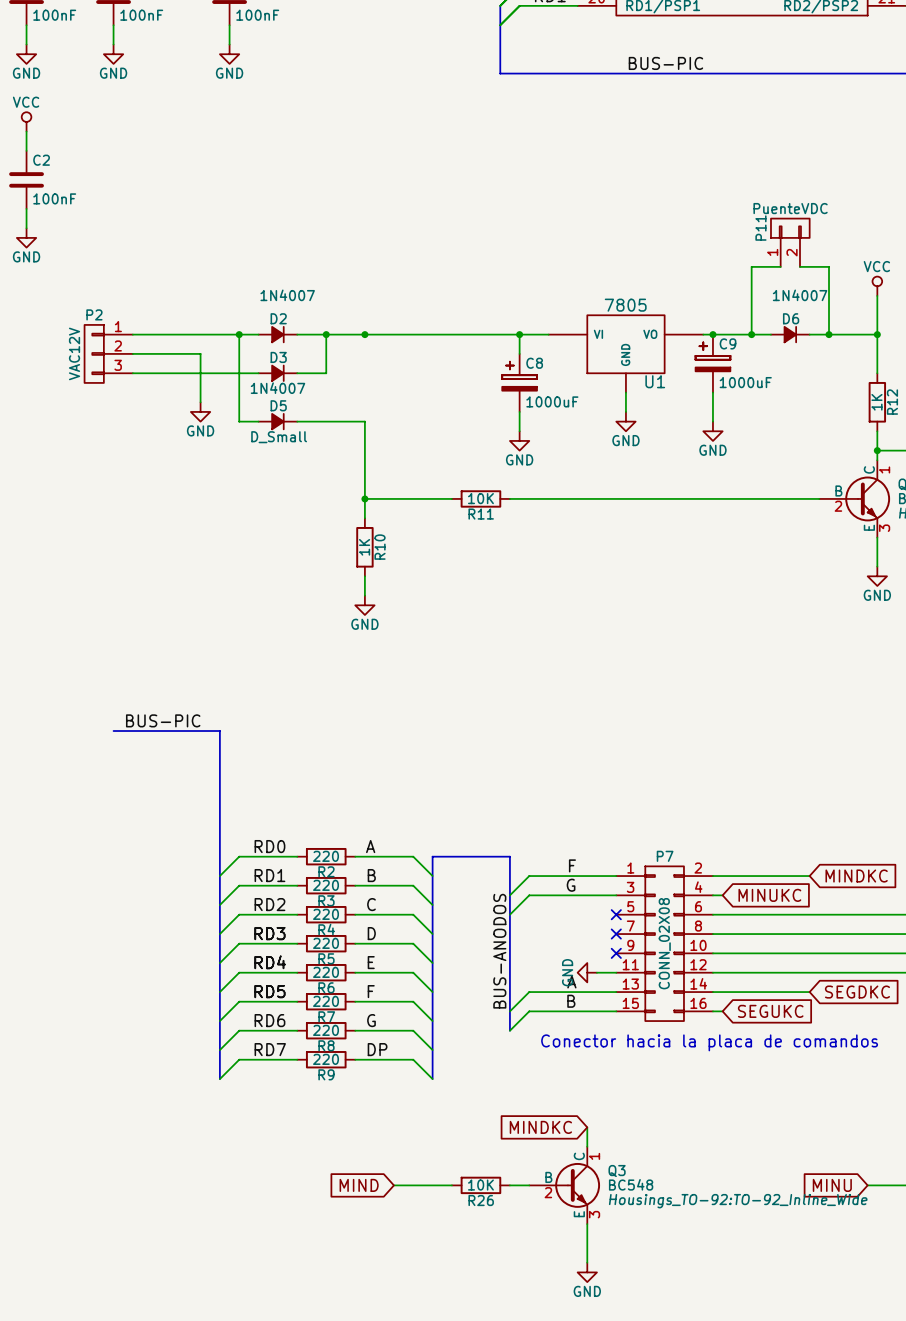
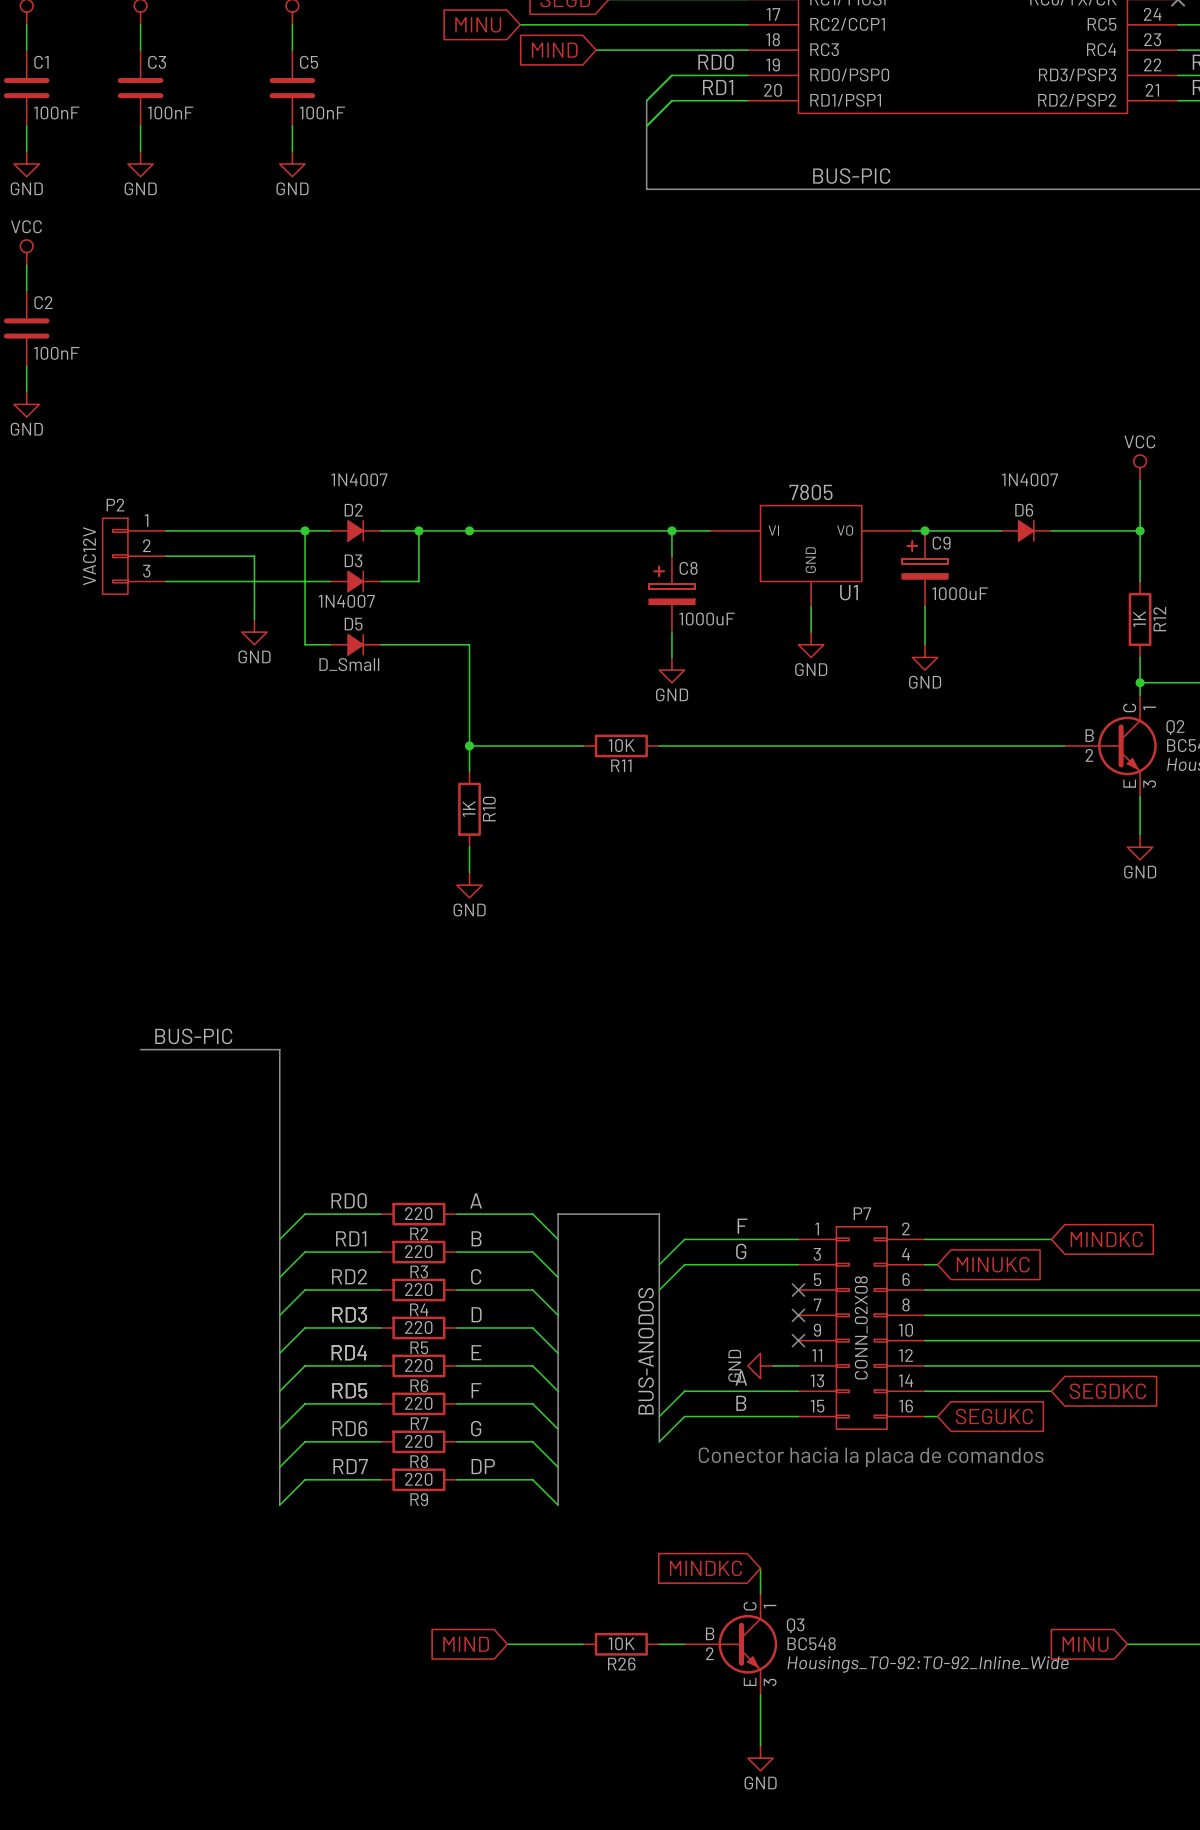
P11: PuenteVDC (790, 242) -> none
wire: (780, 266) (751, 266) (751, 334) -> none
wire: (799, 266) (829, 266) (829, 334) -> none
junction: (751, 334) -> none
junction: (829, 334) -> none

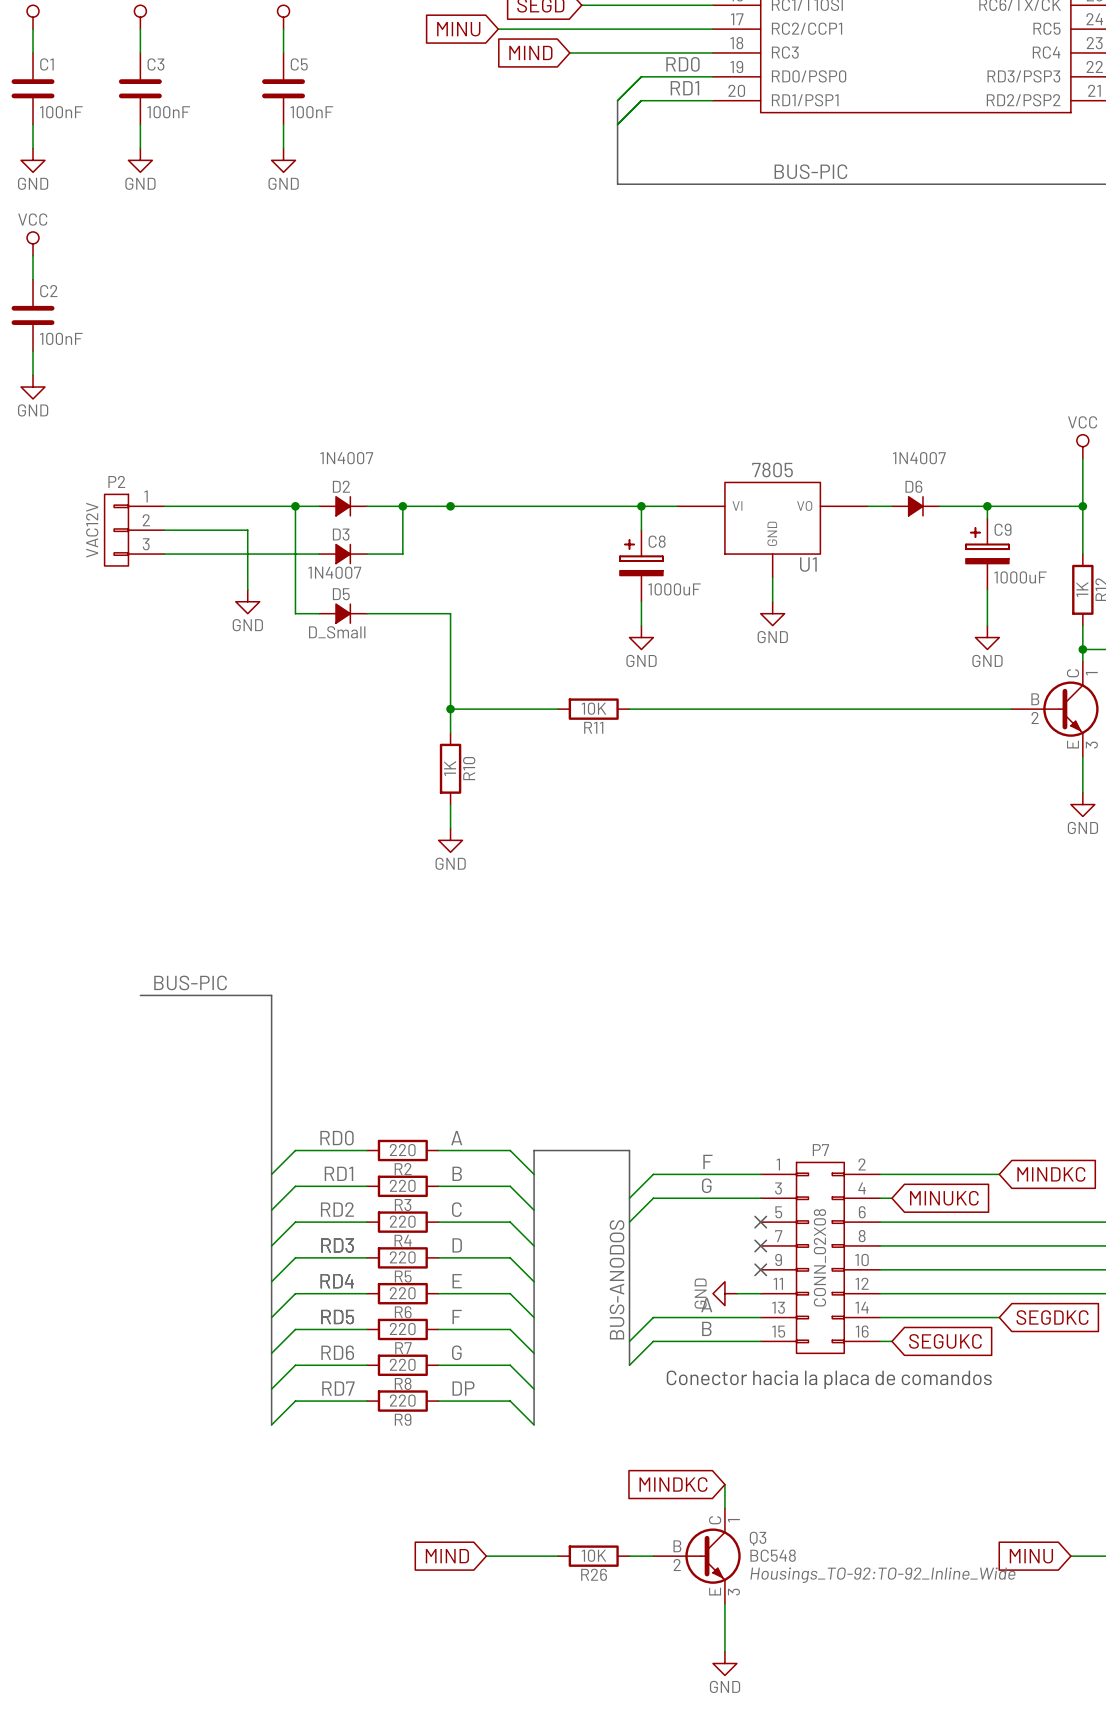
junction: (925, 530) -> none
D6 position: (1026, 530) -> (915, 506)
wire: none -> (987, 506) (987, 518)
junction: none -> (987, 506)
C9 position: (925, 568) -> (987, 554)
wire: (925, 606) (925, 644) -> (987, 589) (987, 625)
power symbol position: GND (925, 657) -> GND (987, 637)

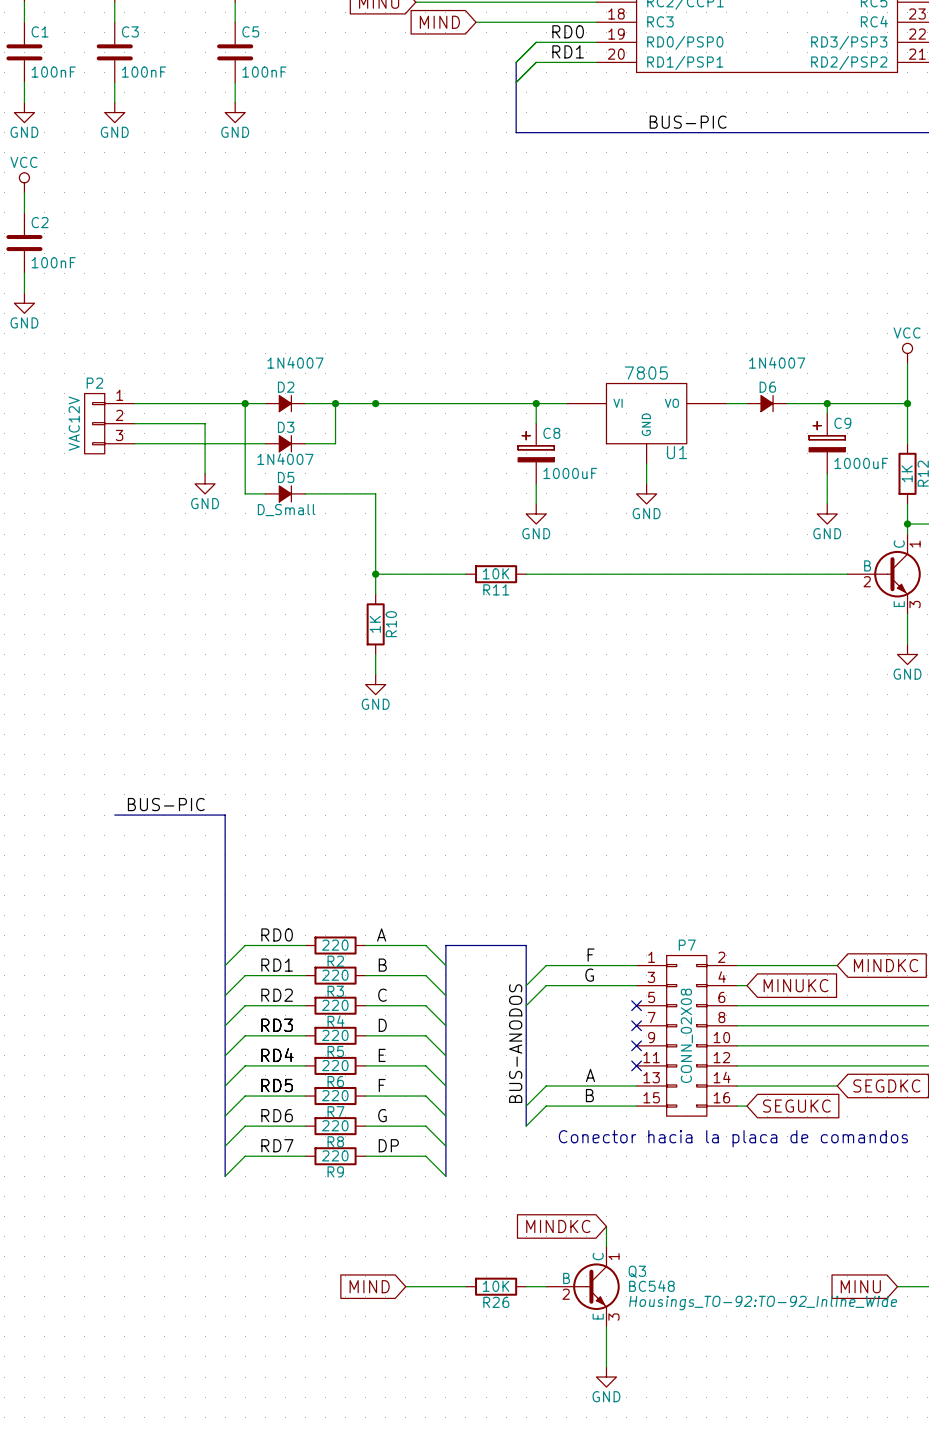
power symbol: GND (724, 1293) -> none
wire: (736, 1293) (760, 1293) -> none
no-connect mark: none -> (636, 1065)

